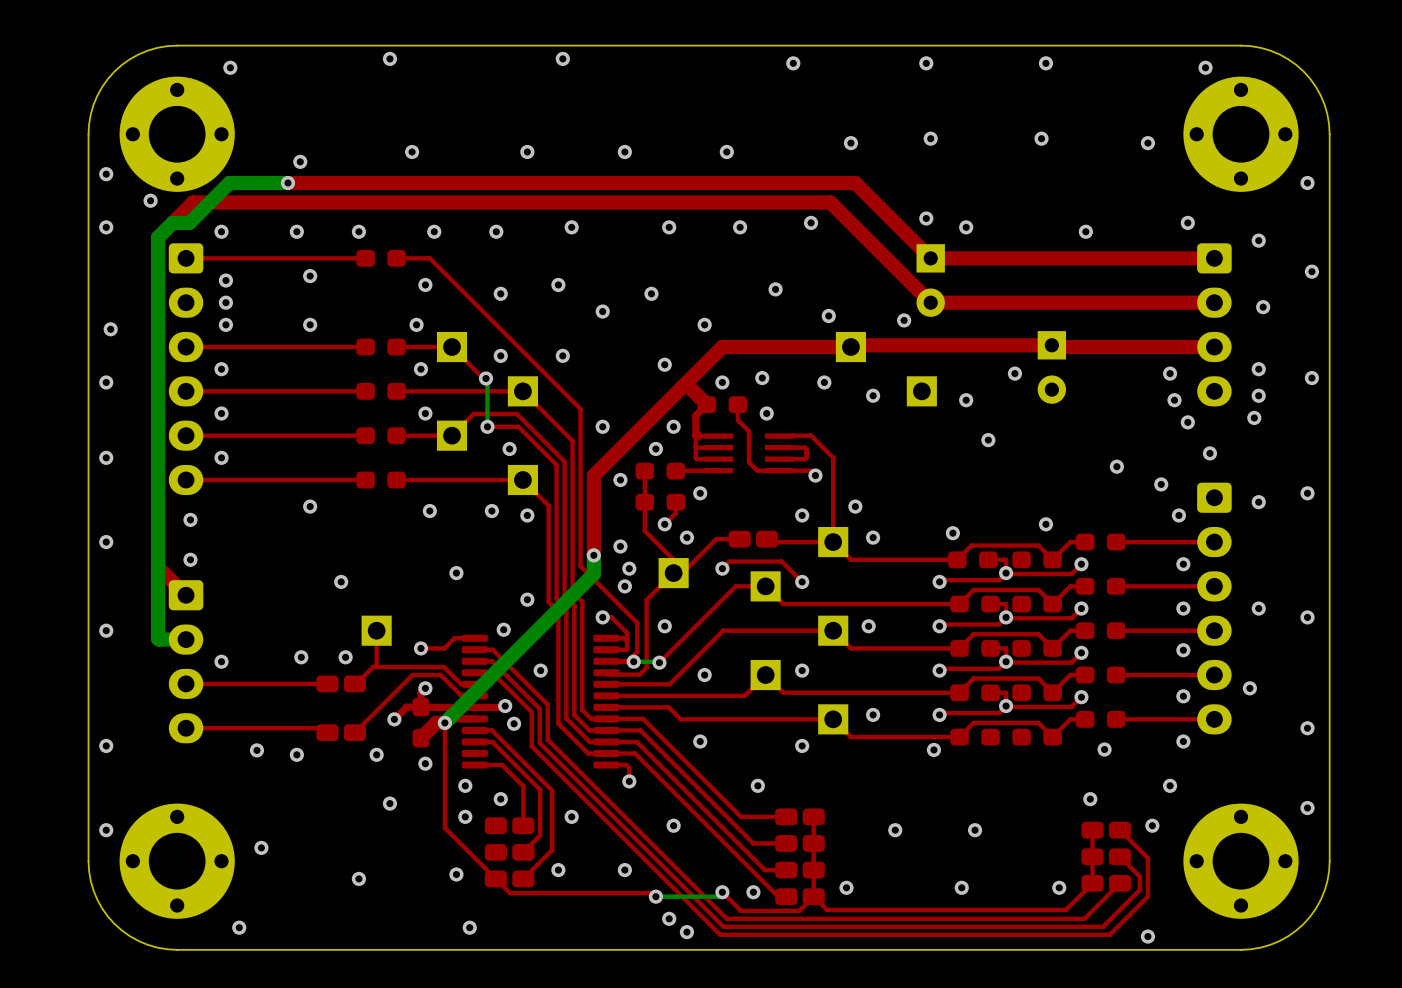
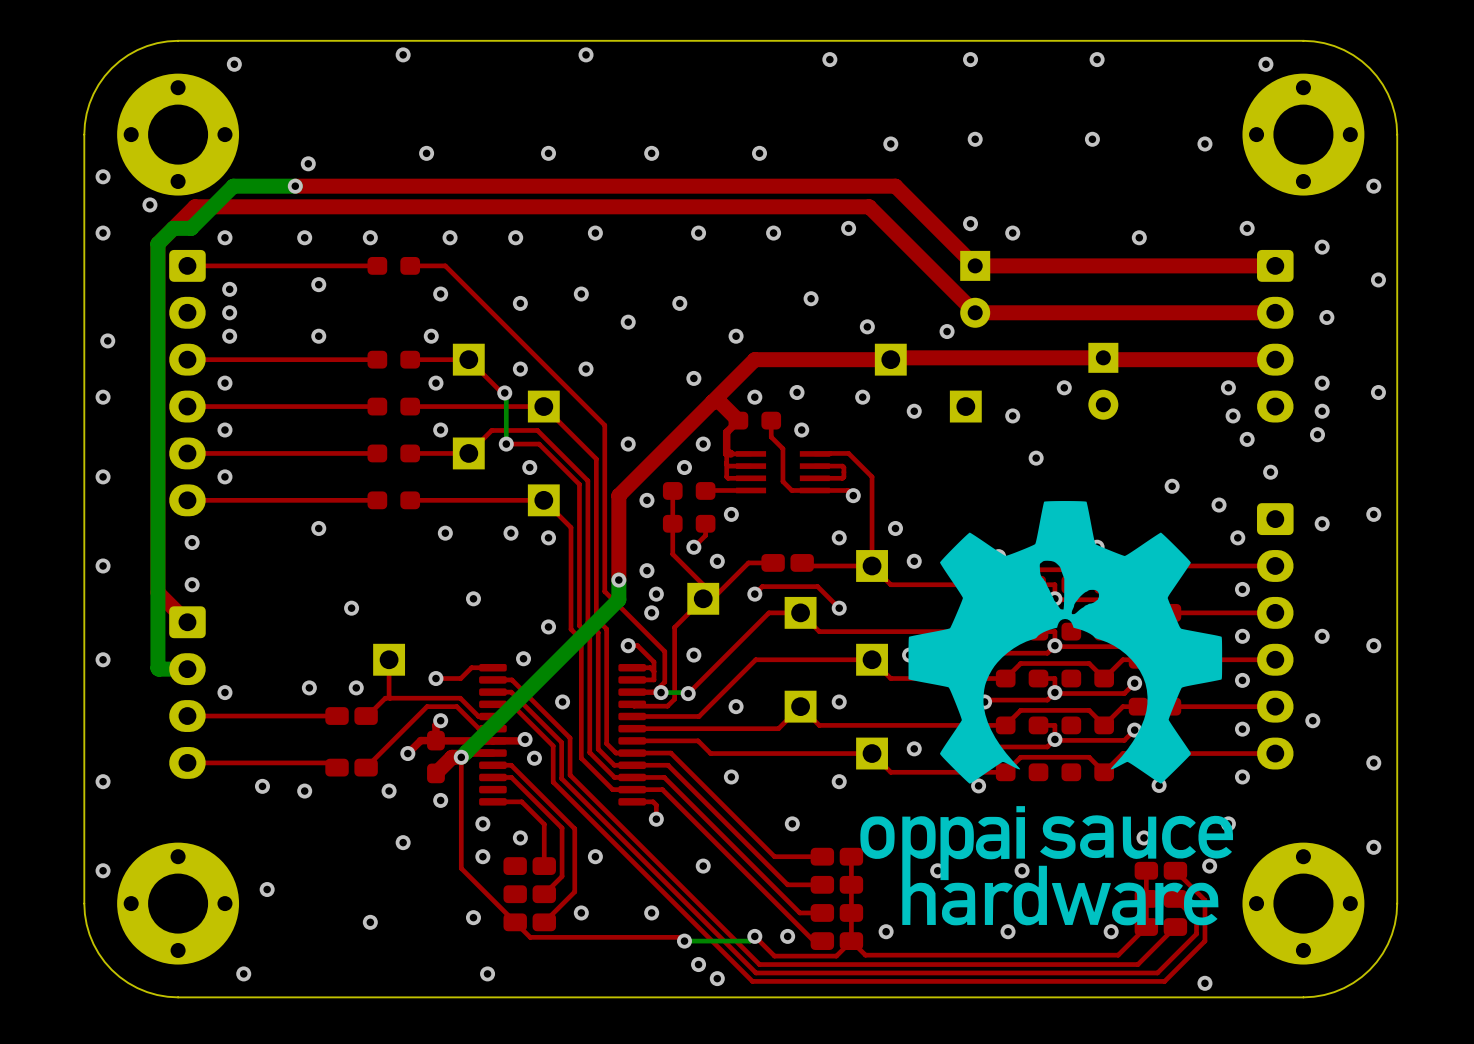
drawing: none -> [860, 501, 1234, 926]

